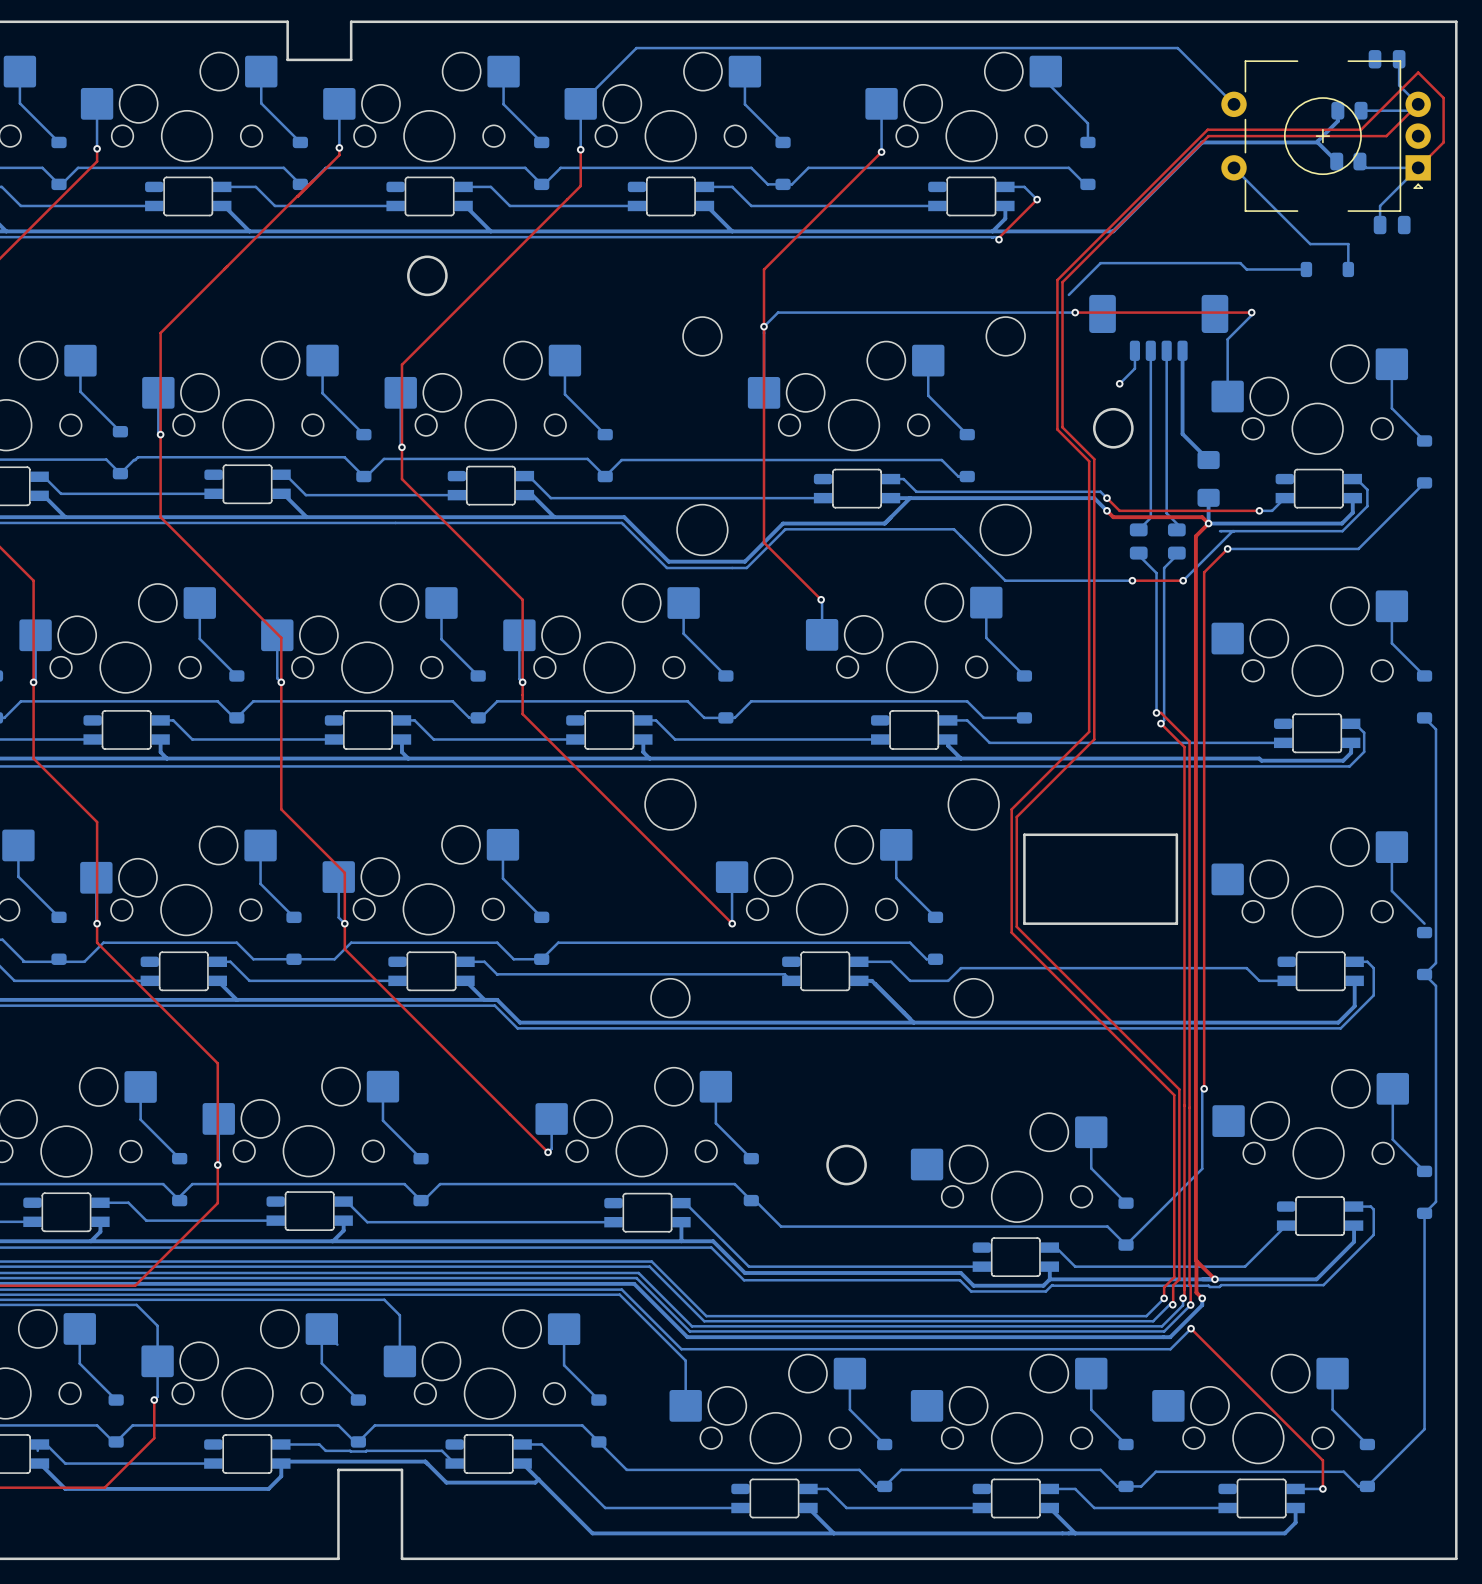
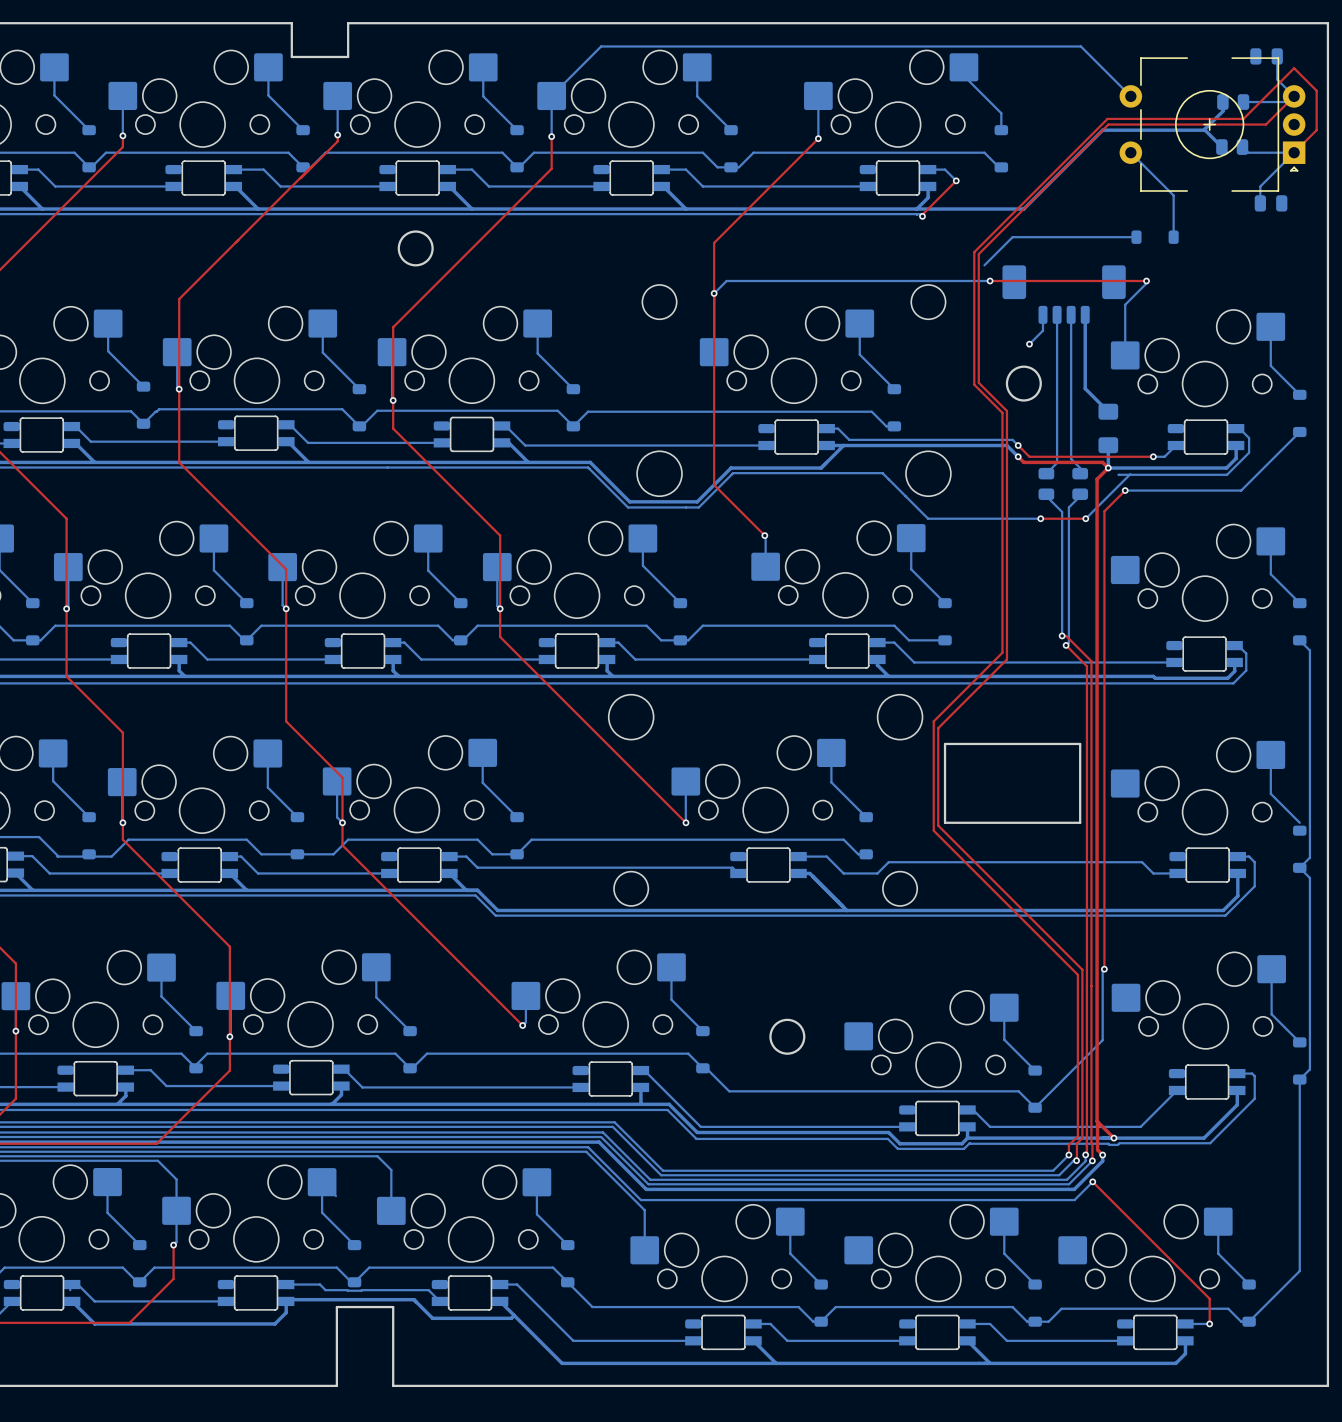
bottom track: (1282, 216) (1310, 244) (1348, 244) (1348, 269) -> (1173, 195) (1173, 237)
bottom track: (1240, 263) (1246, 269) (1306, 269) -> none
part position: (1327, 269) -> (1155, 237)

